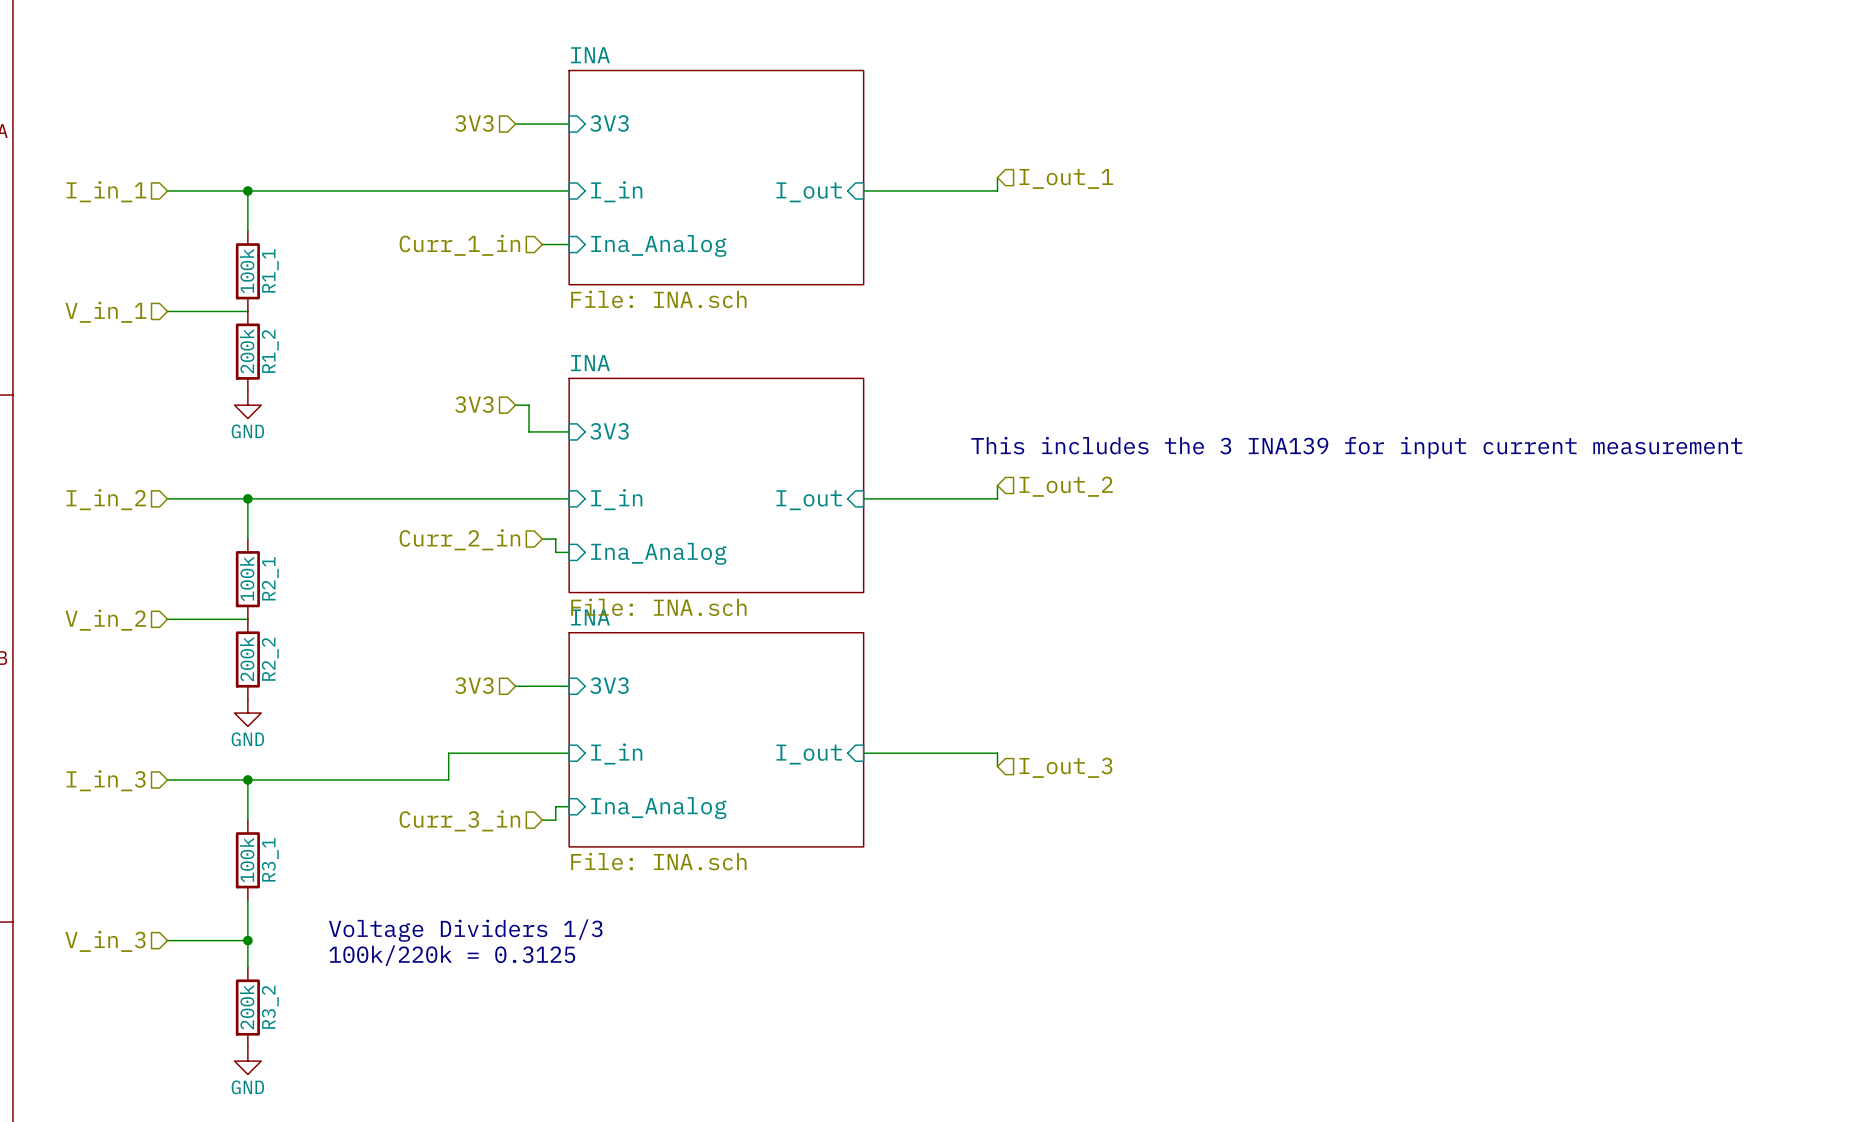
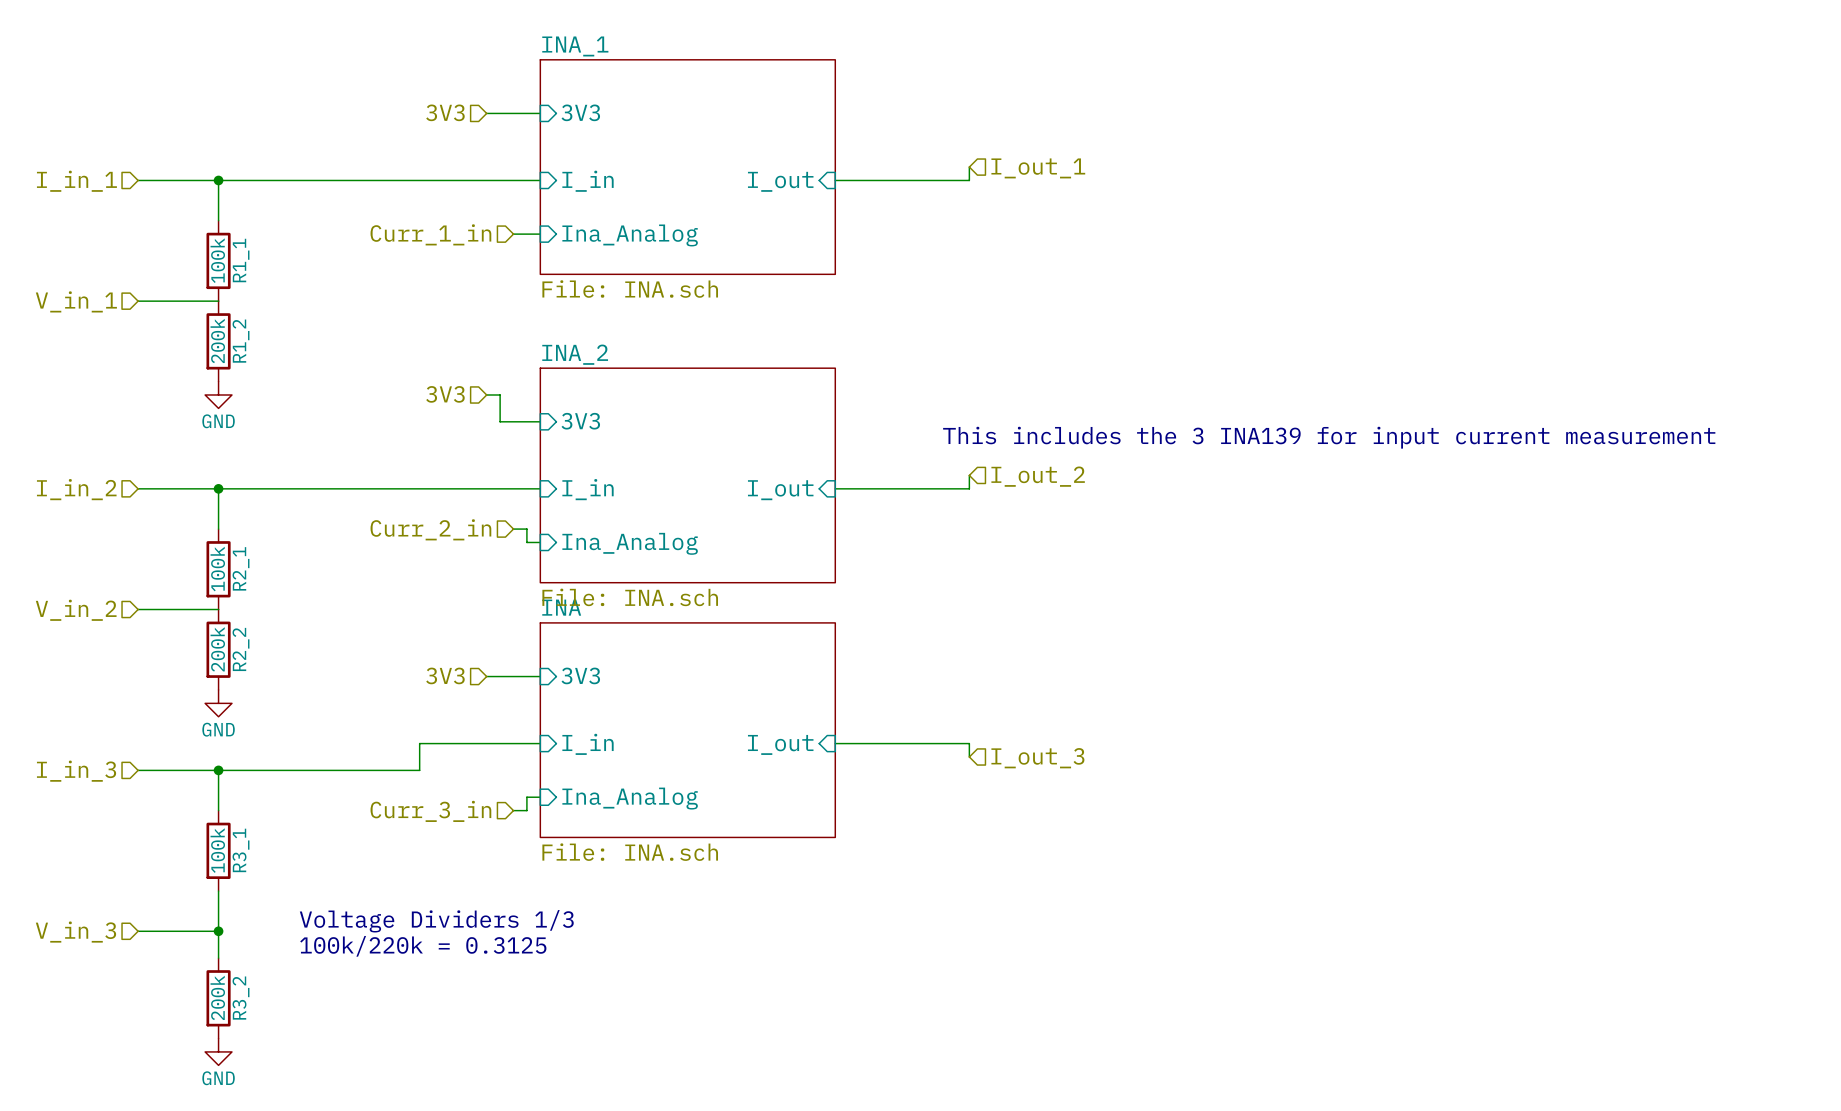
sheet INA name: INA (590, 55) -> INA_1 (575, 46)
sheet INA name: INA (590, 363) -> INA_2 (575, 354)

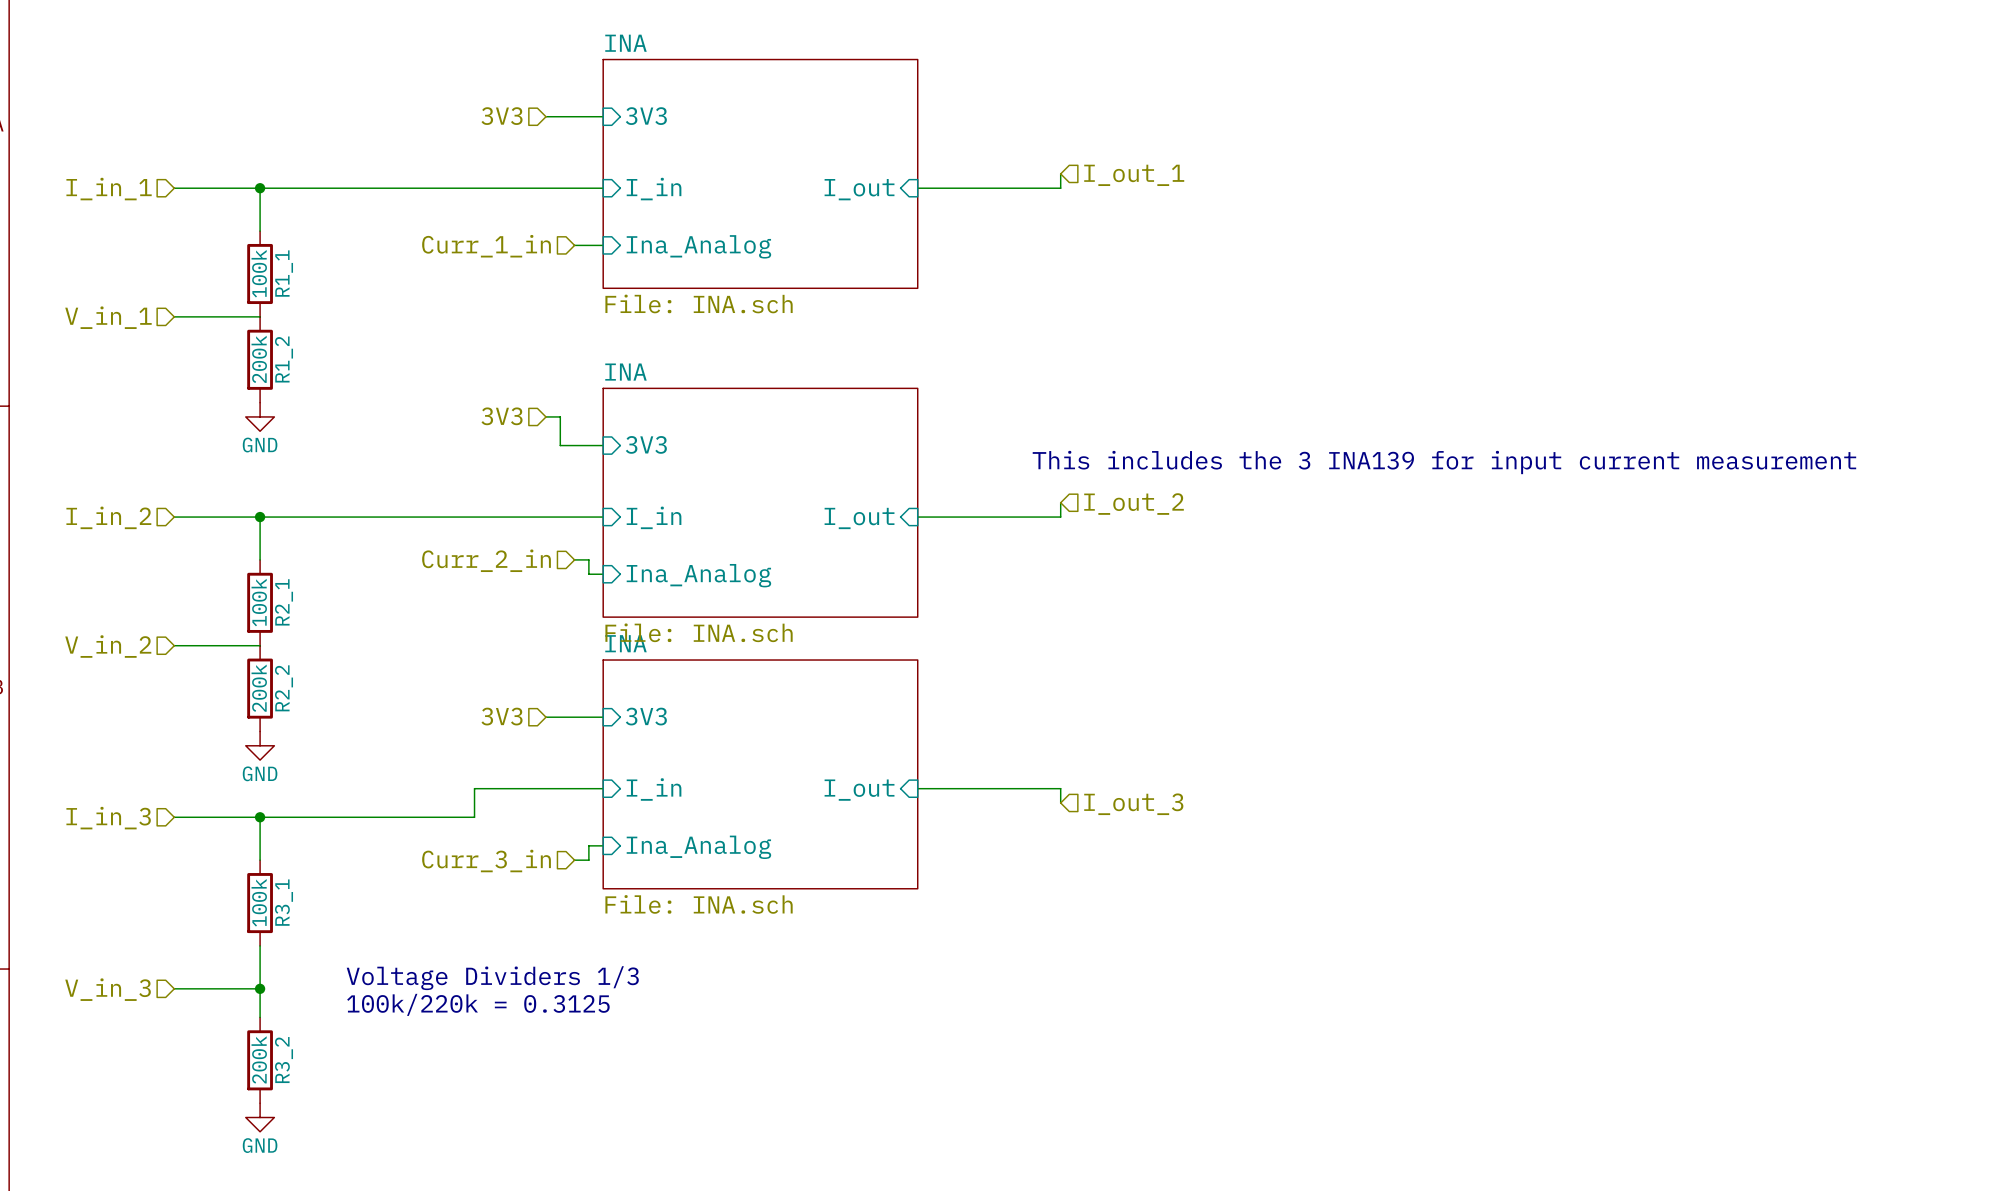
sheet INA_1 name: INA_1 (575, 46) -> INA (625, 43)
sheet INA_2 name: INA_2 (575, 354) -> INA (625, 372)

